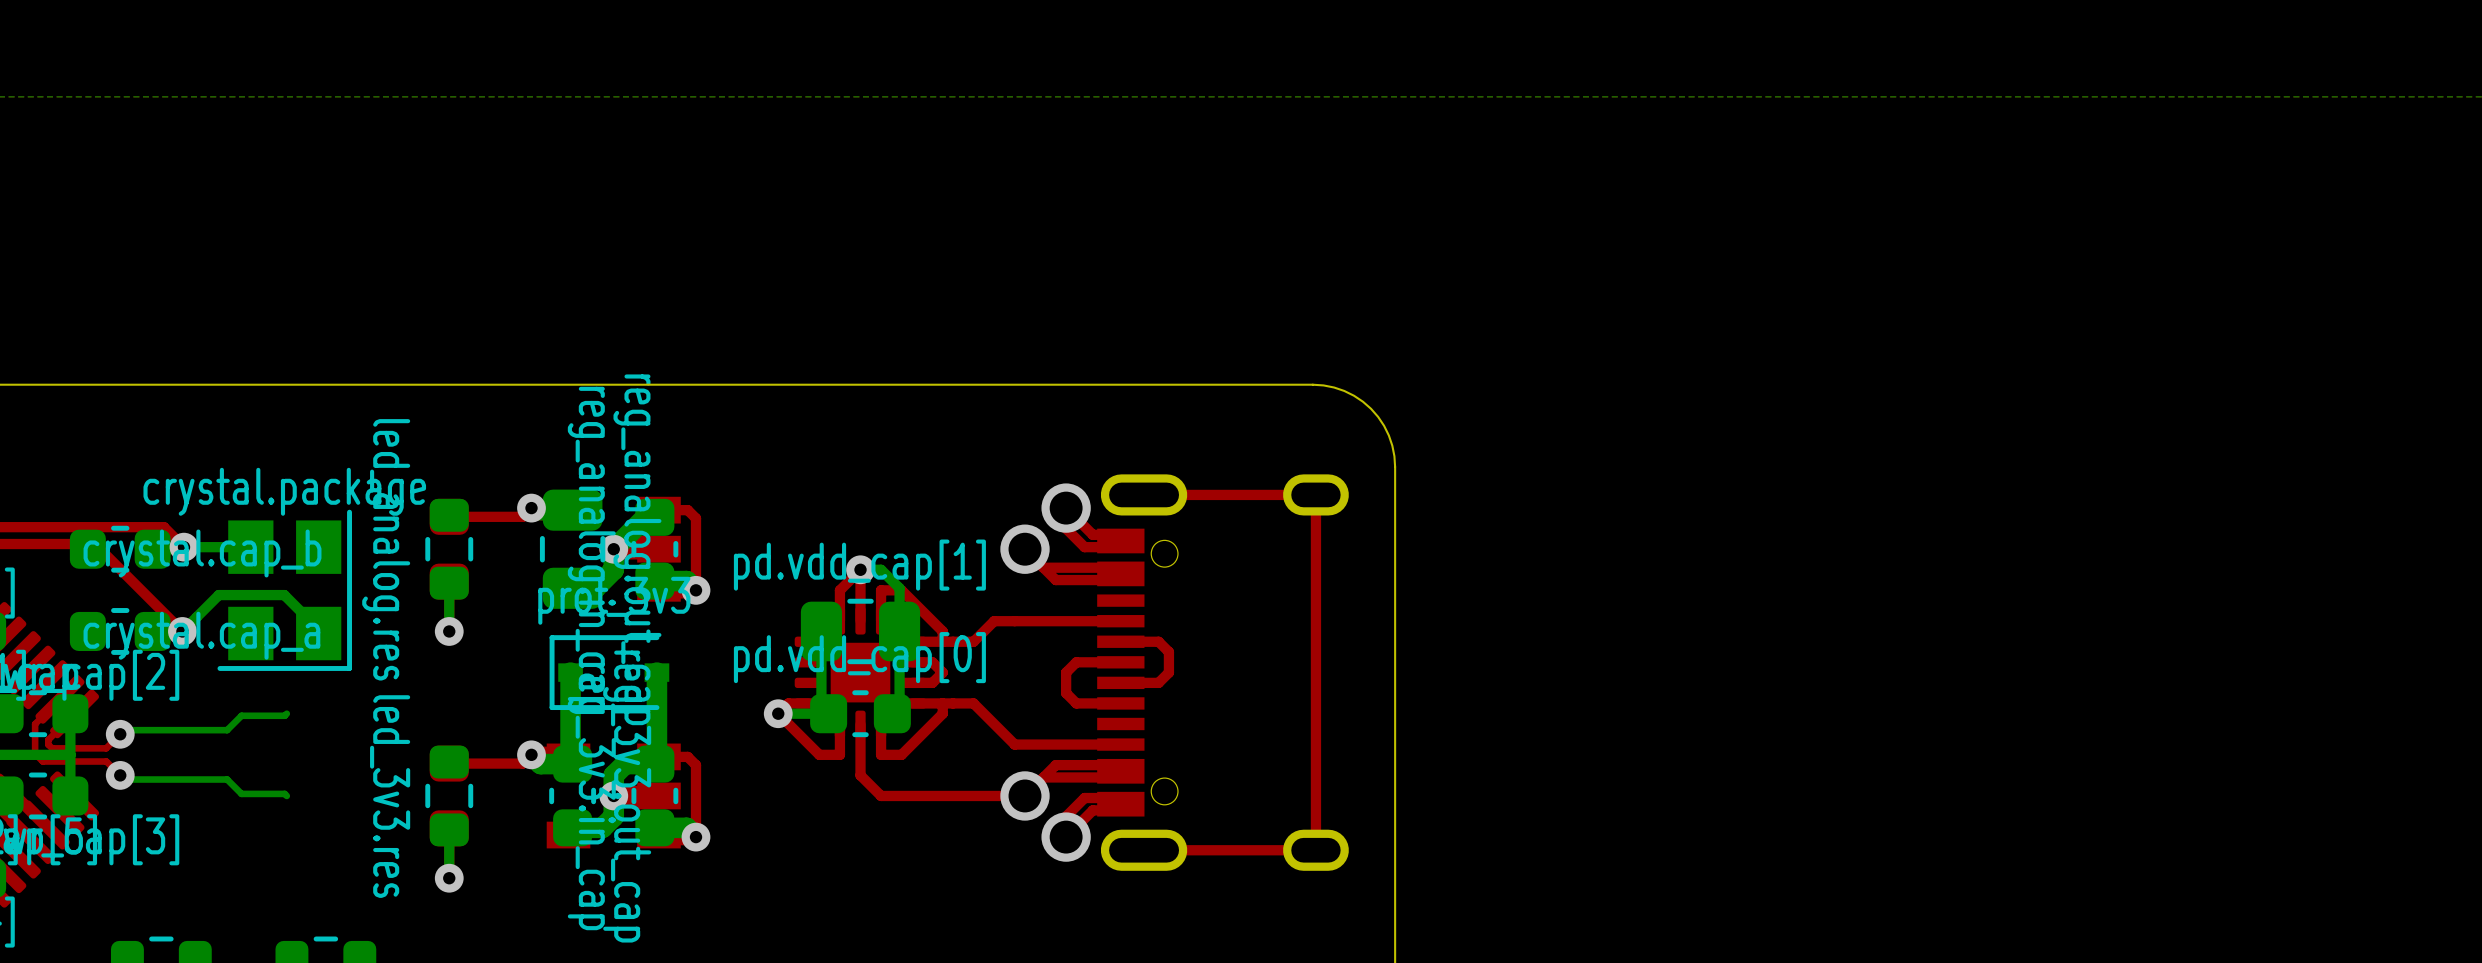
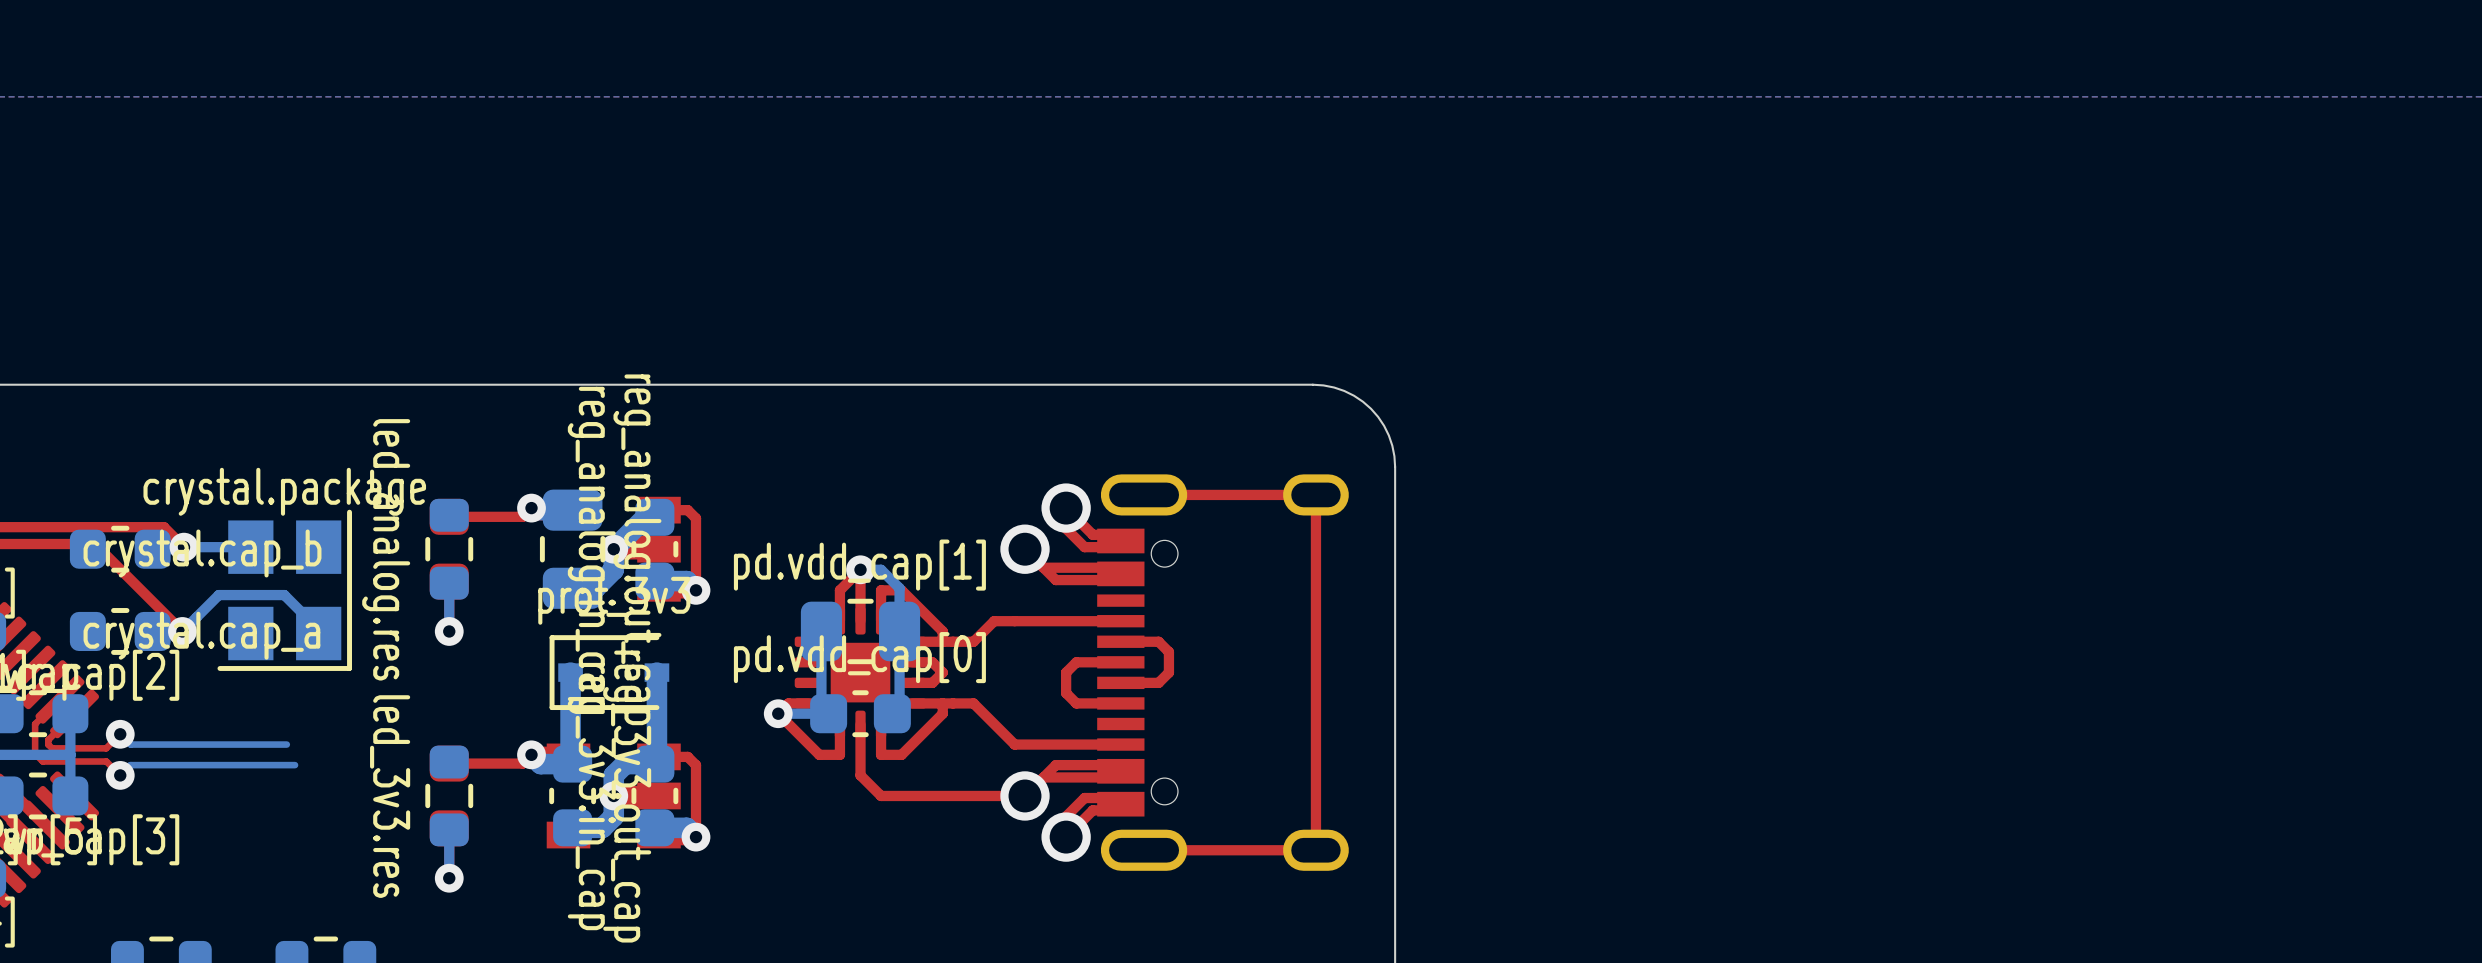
bottom track: (286, 713) (284, 715) (241, 715) (227, 730) (124, 730) (120, 734) -> (286, 744) (130, 744) (120, 734)
bottom track: (120, 775) (124, 779) (227, 779) (241, 793) (284, 793) (286, 795) -> (120, 775) (130, 765) (295, 765)

